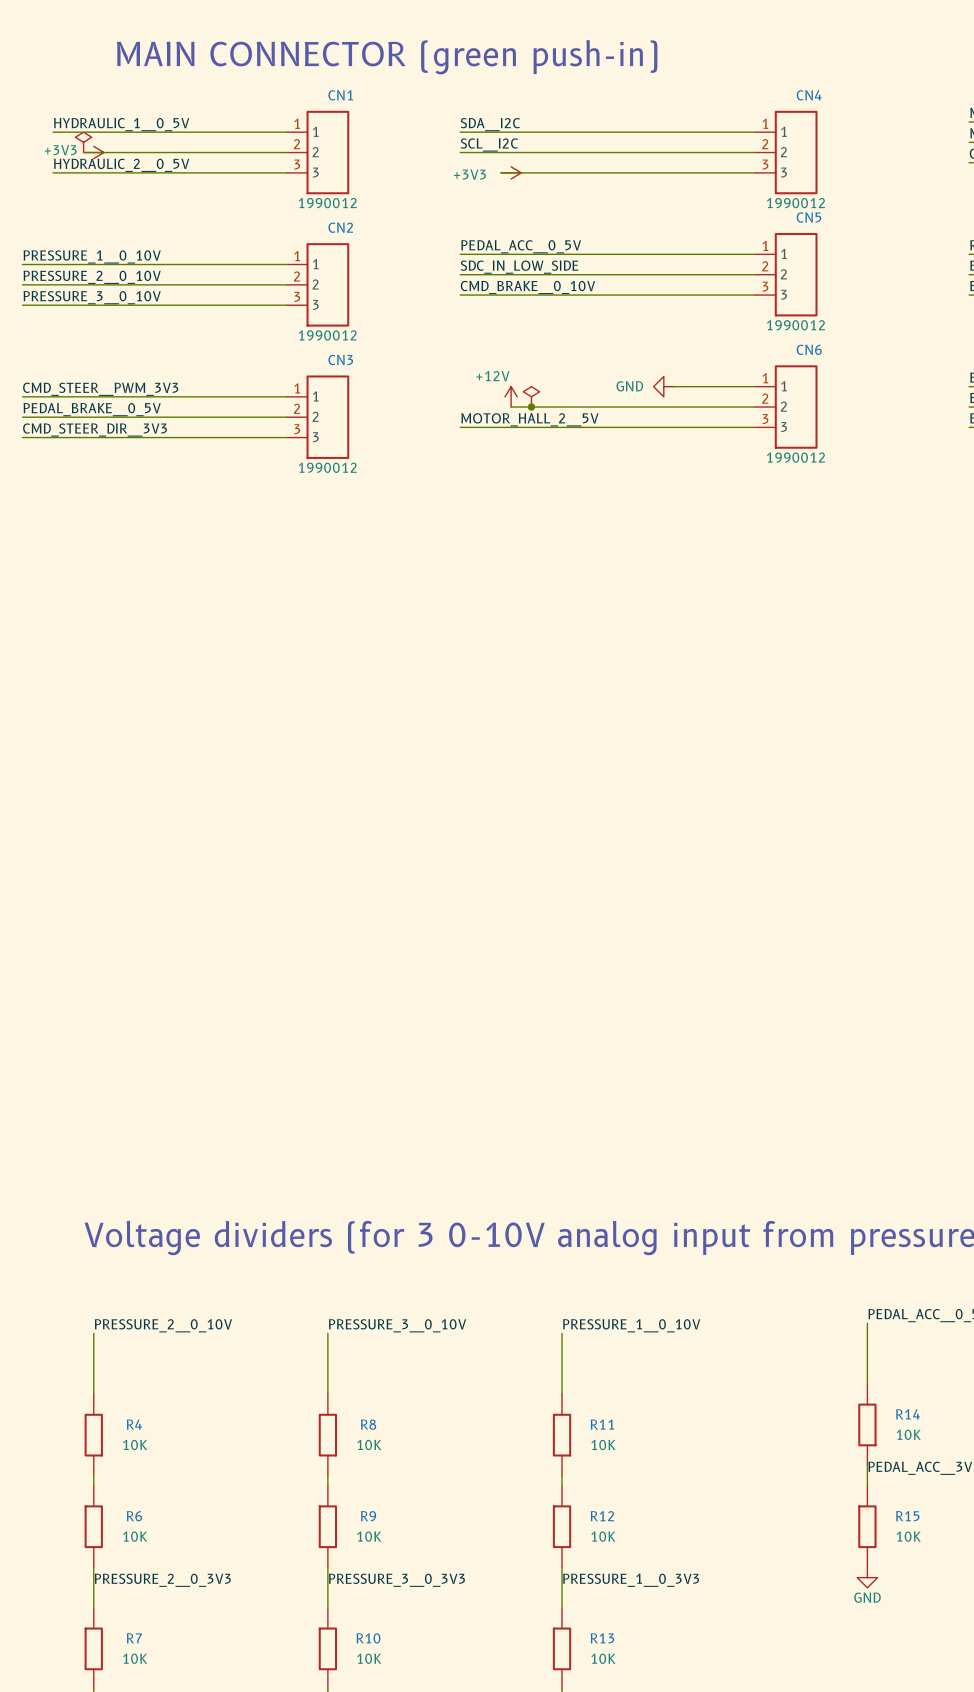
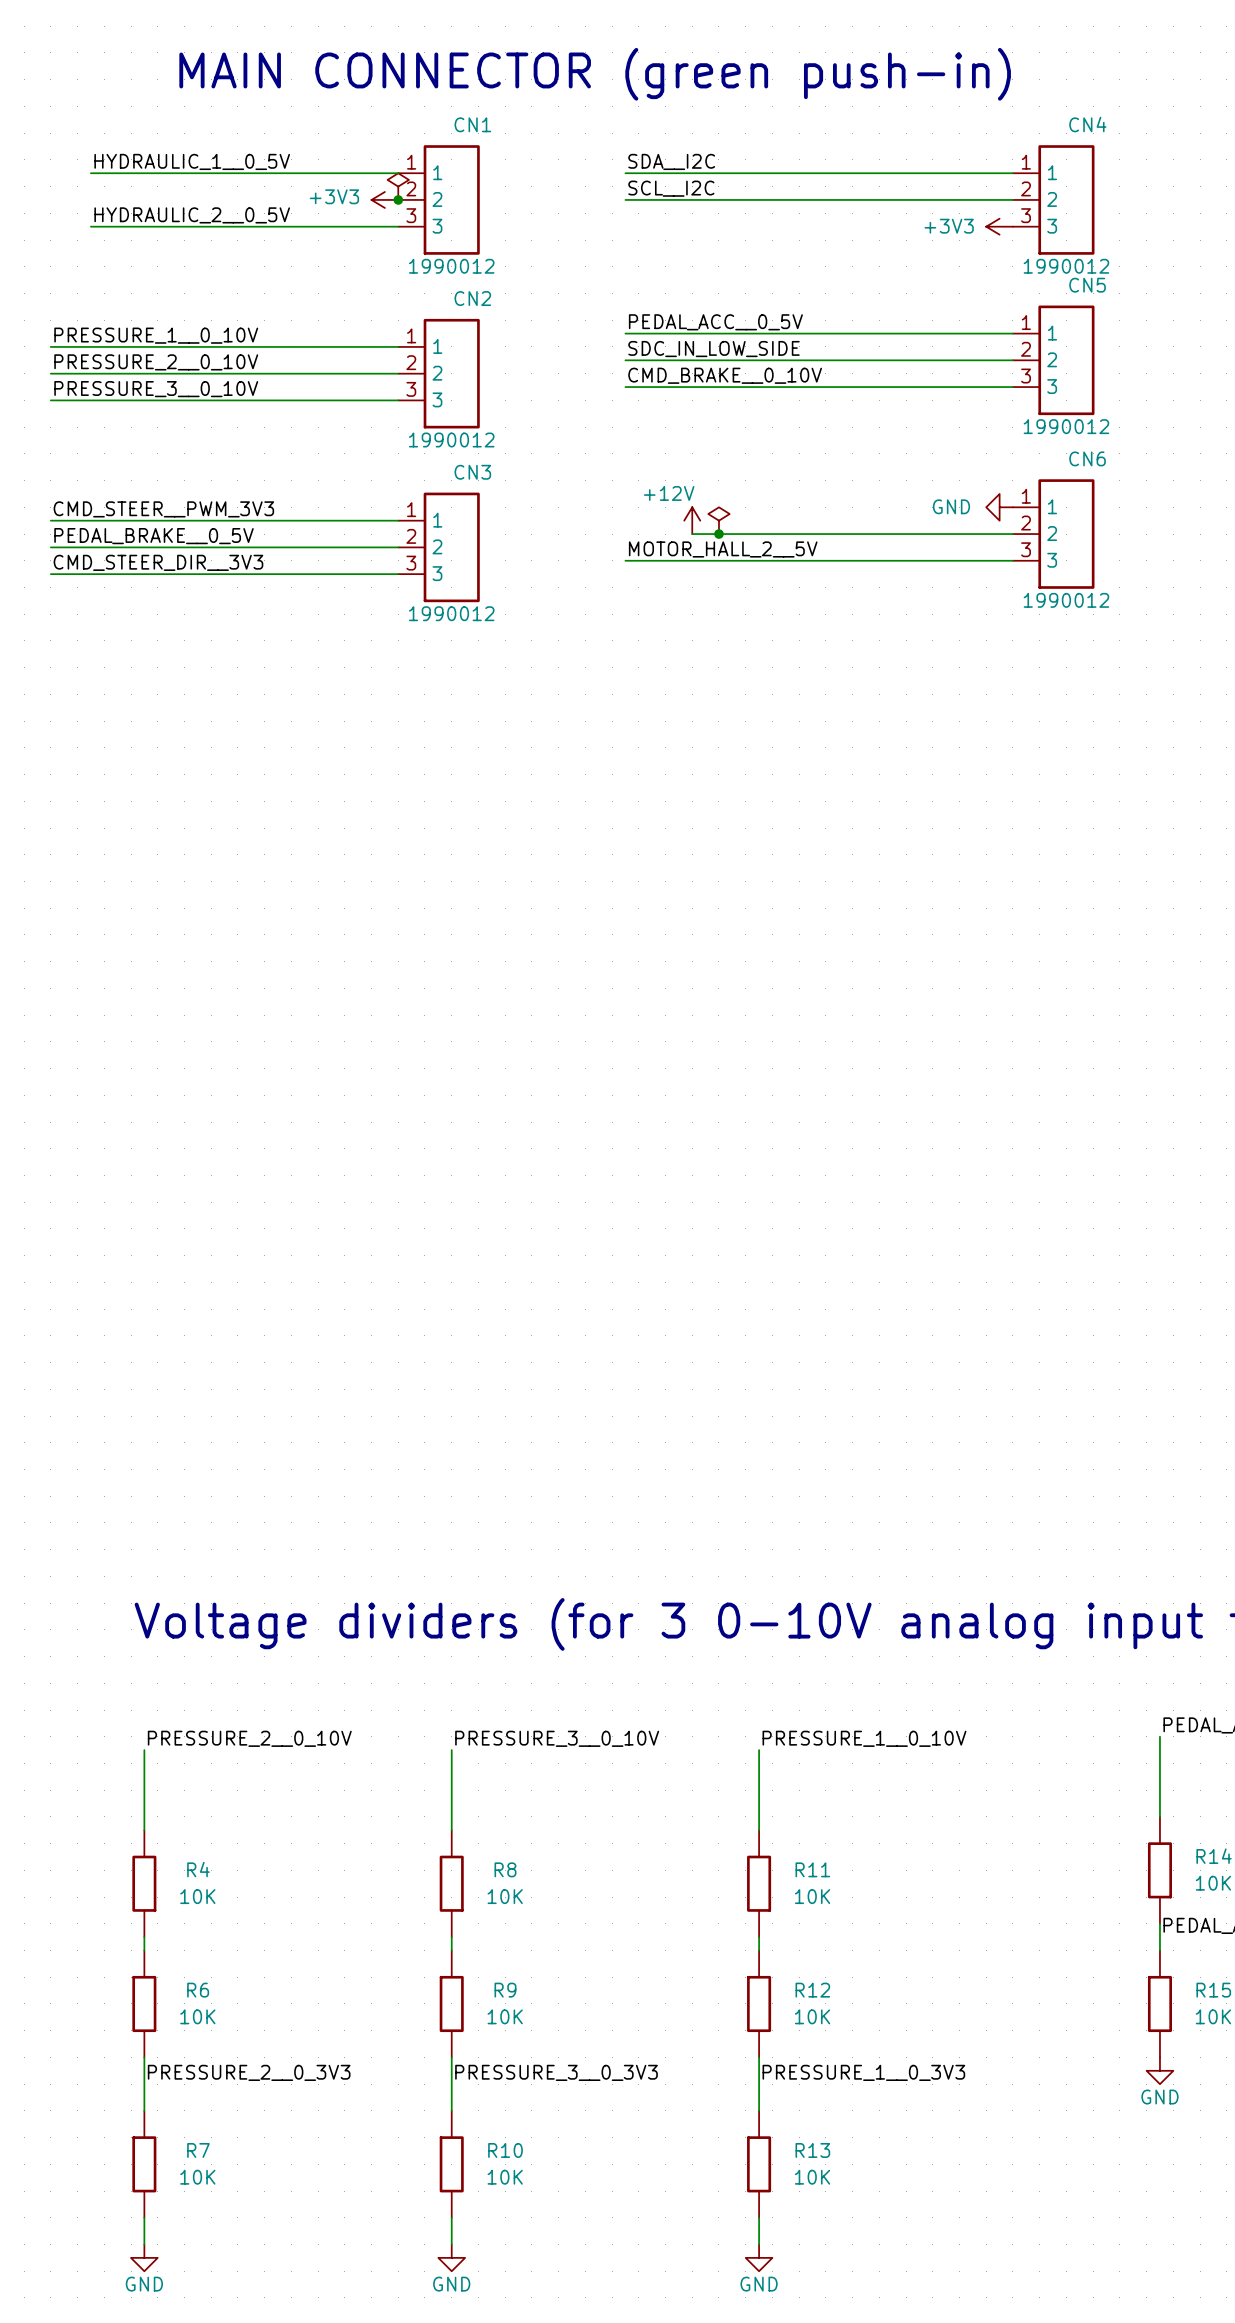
power symbol: (83, 142) -> none
power symbol: none -> (398, 186)
wire: (83, 152) (287, 152) -> none
power symbol: +3V3 (93, 152) -> none
power symbol: none -> +3V3 (384, 199)
junction: none -> (398, 199)
wire: (500, 172) (755, 172) -> none
power symbol: +3V3 (511, 172) -> none
power symbol: none -> +3V3 (999, 226)
power symbol position: GND (663, 386) -> GND (999, 507)
wire: (673, 386) (755, 386) -> none

